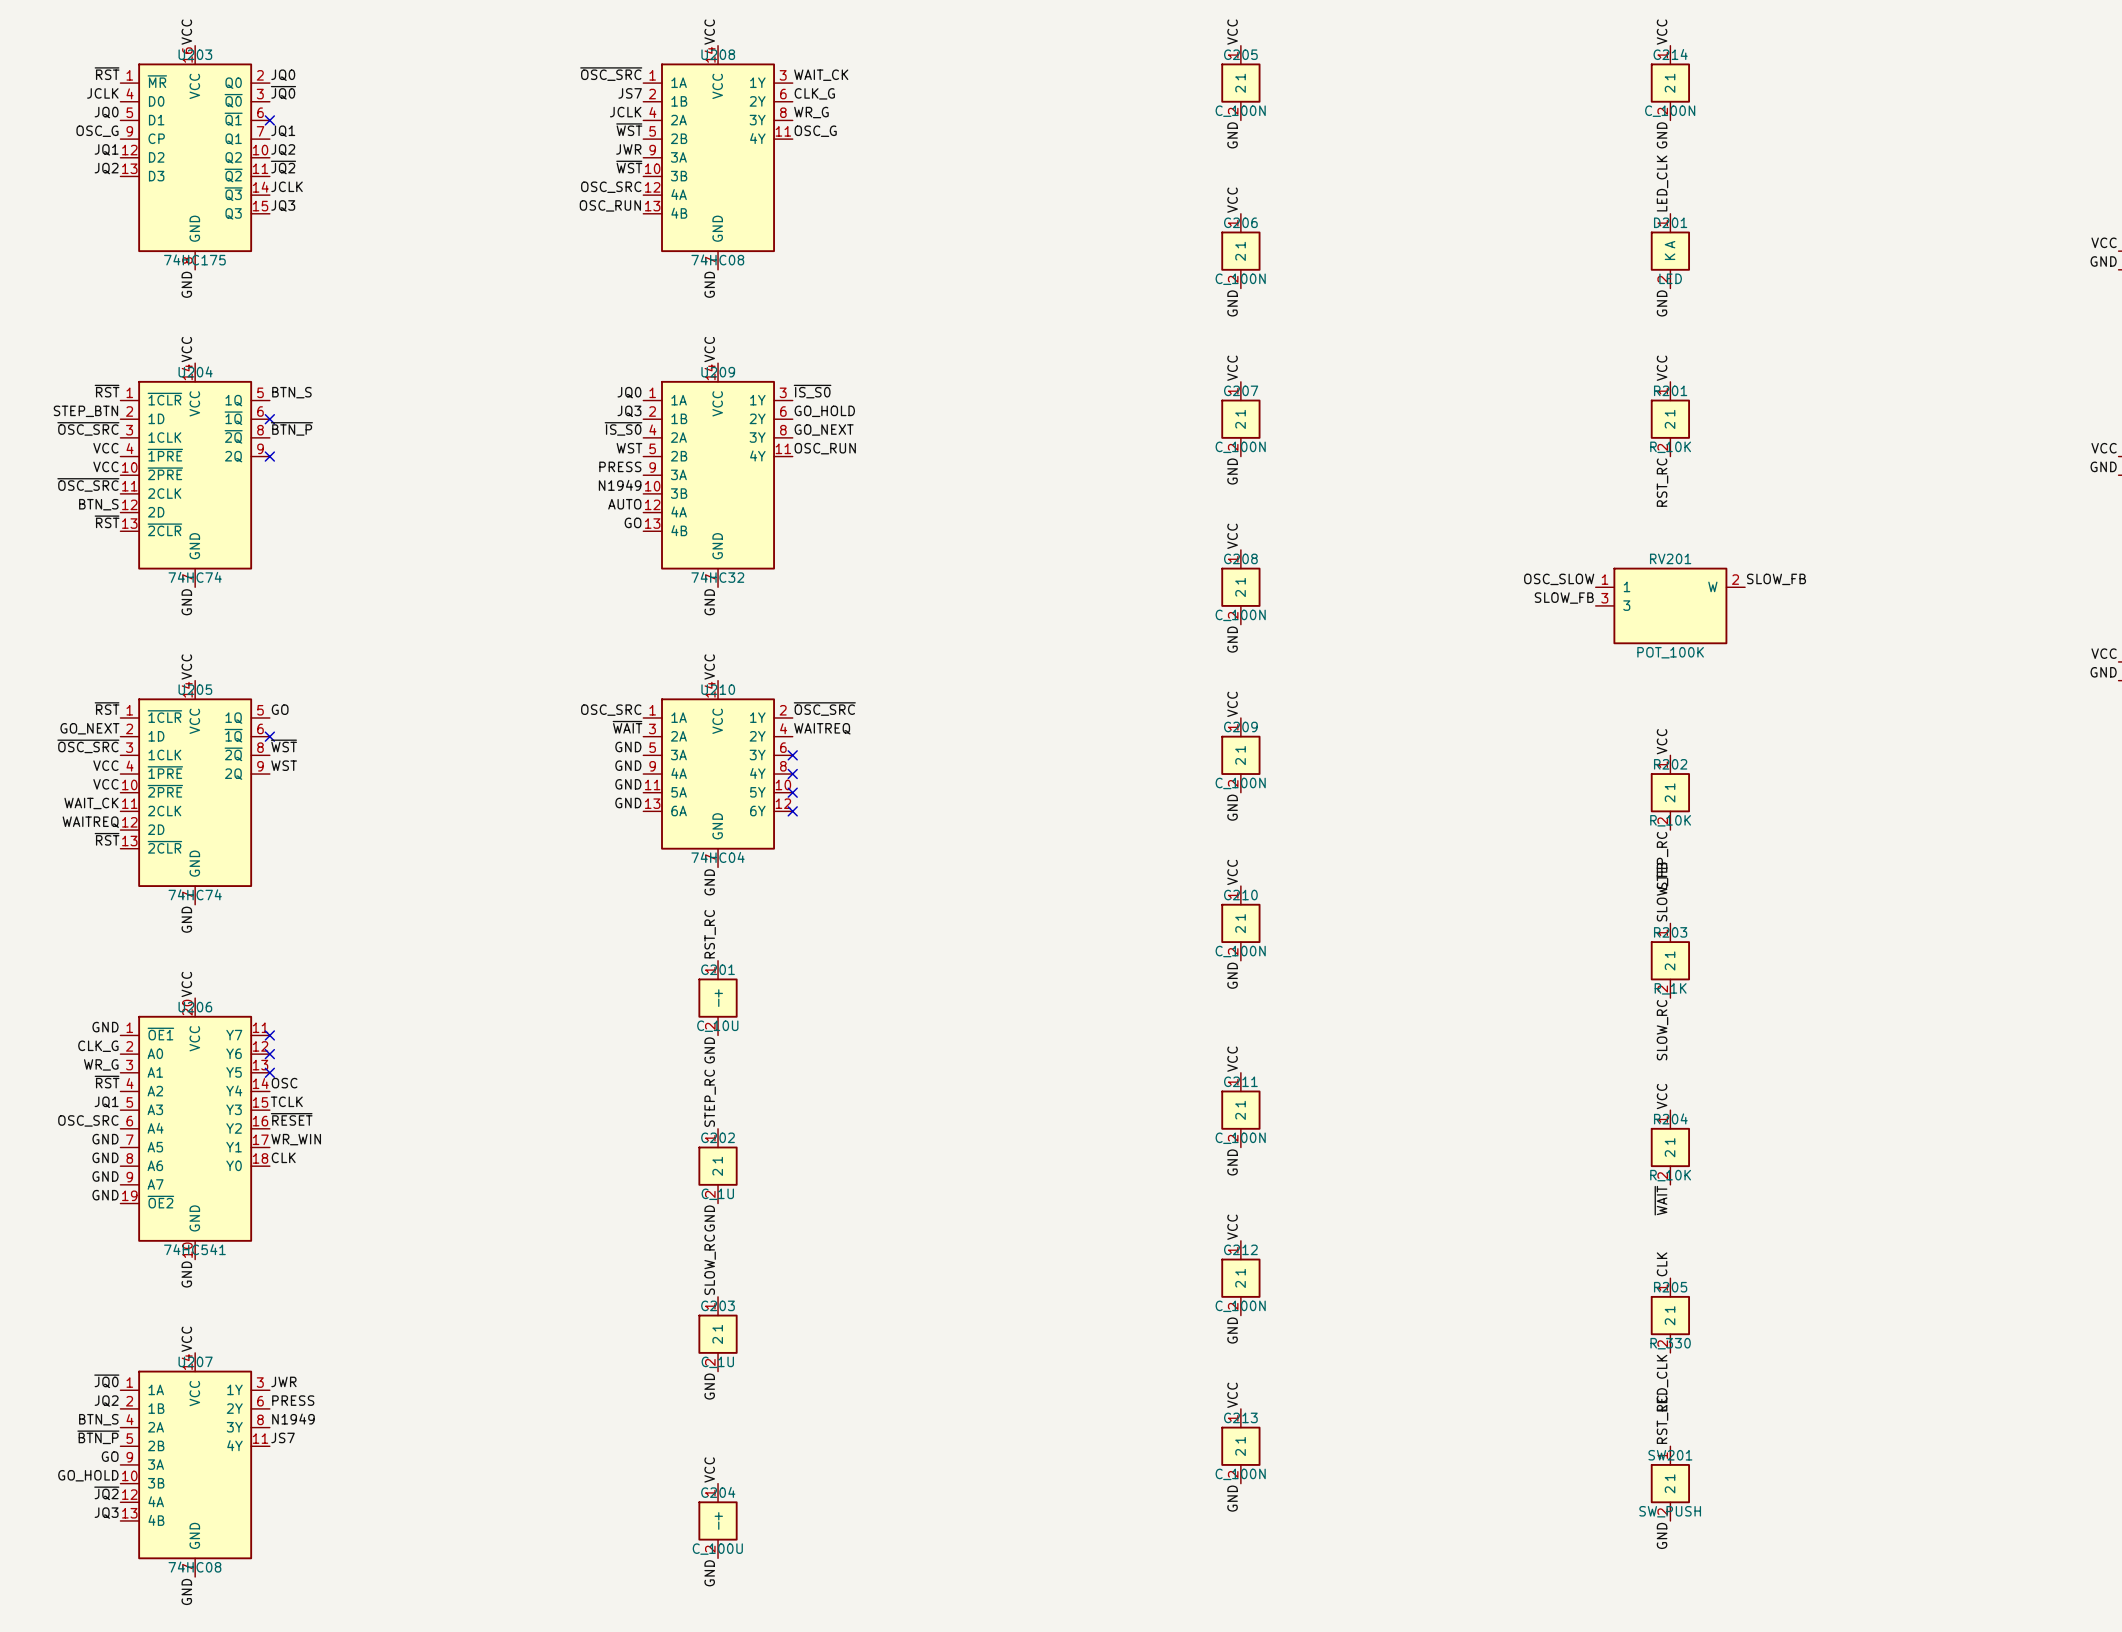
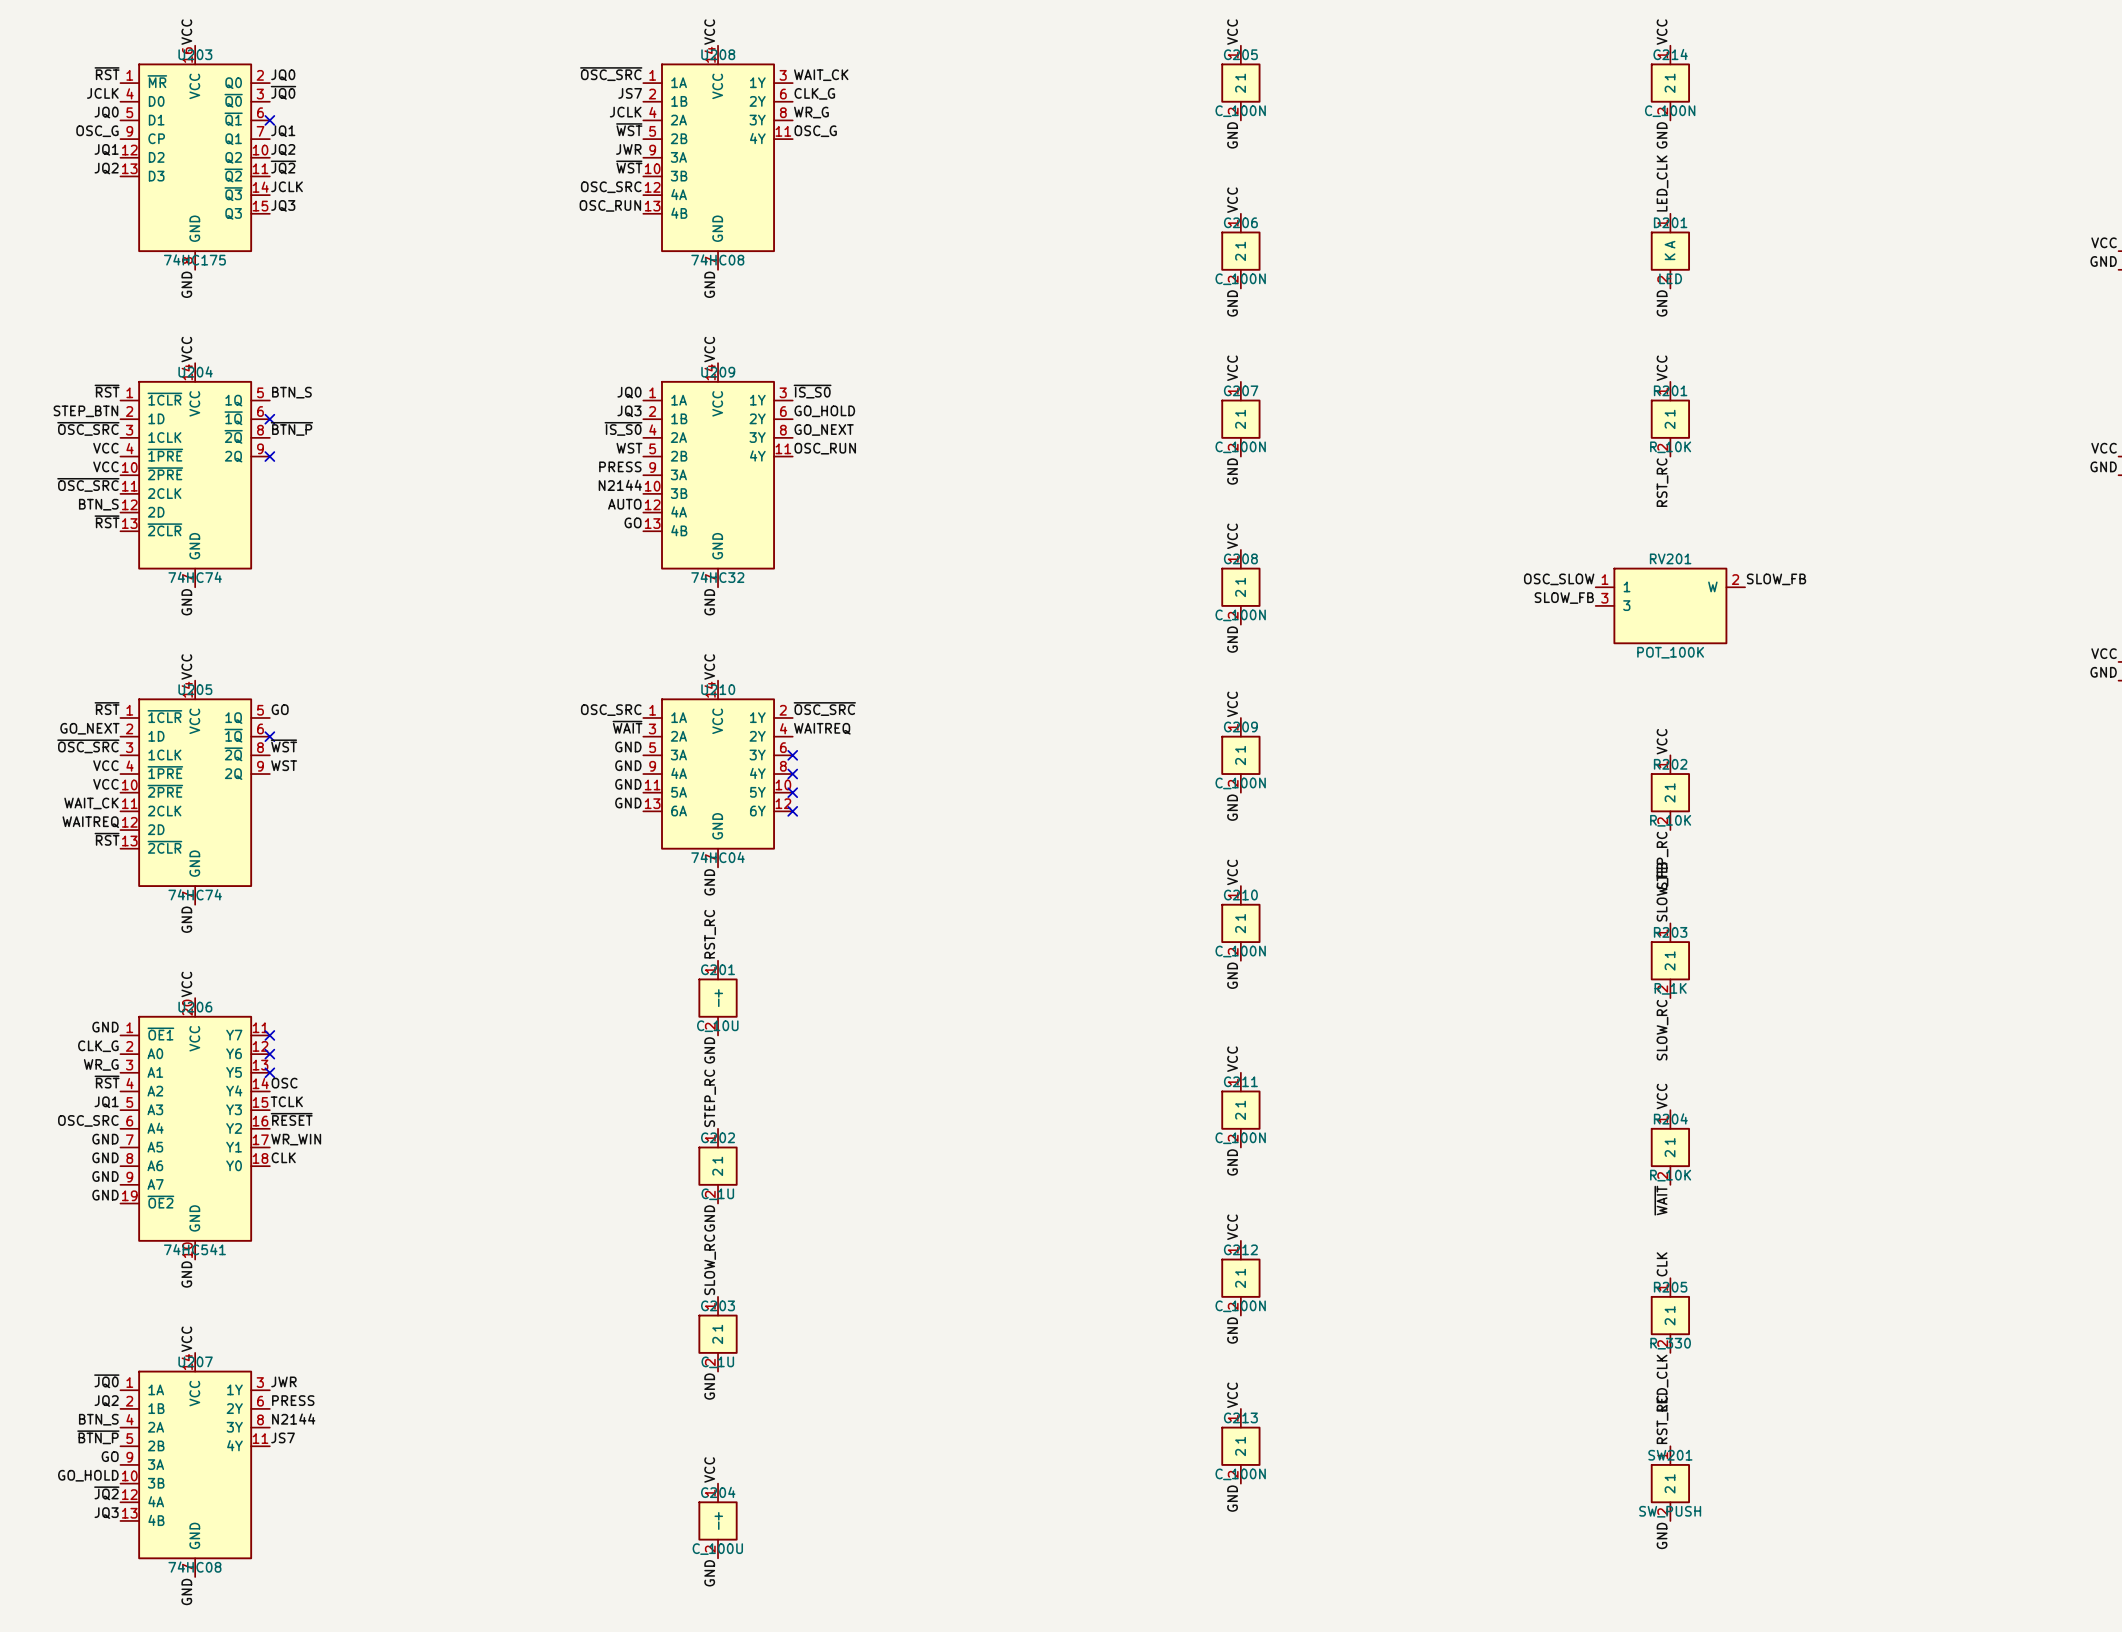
label: N1949 (620, 485) -> N2144 (620, 485)
label: N1949 (293, 1419) -> N2144 (293, 1419)

